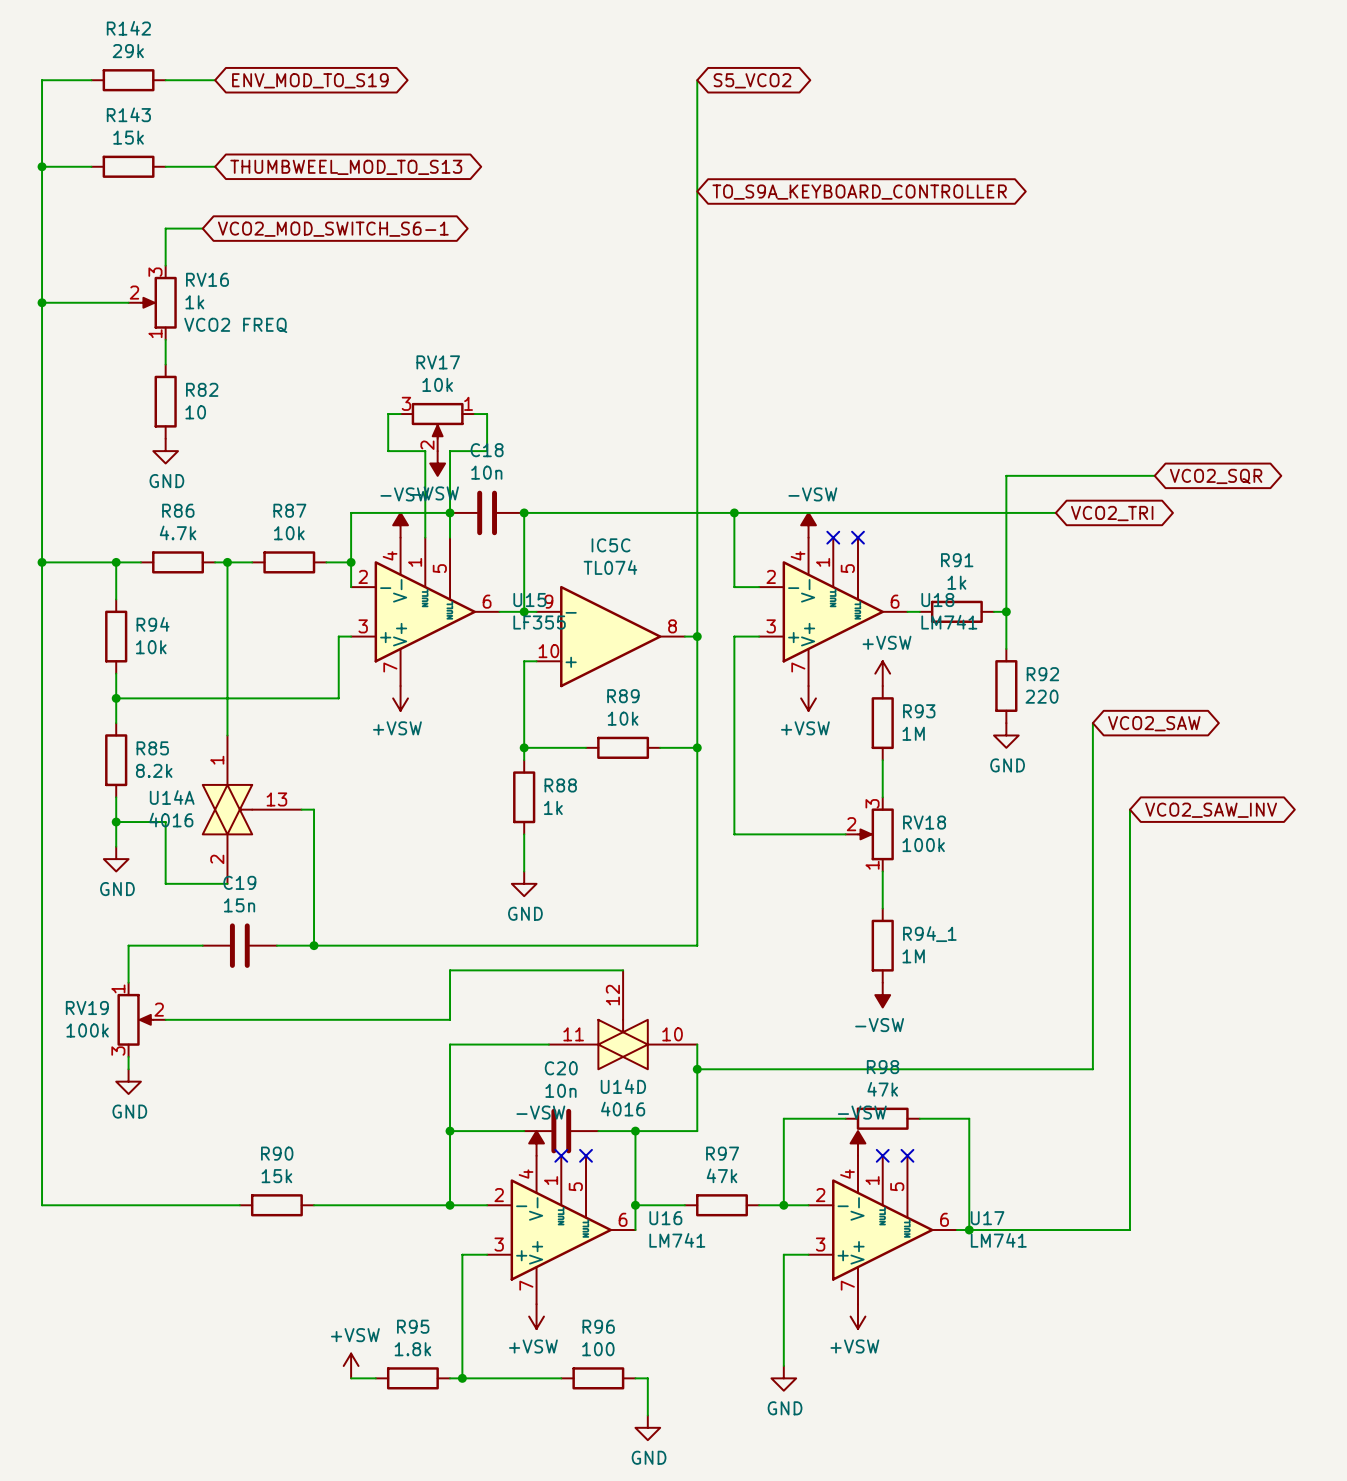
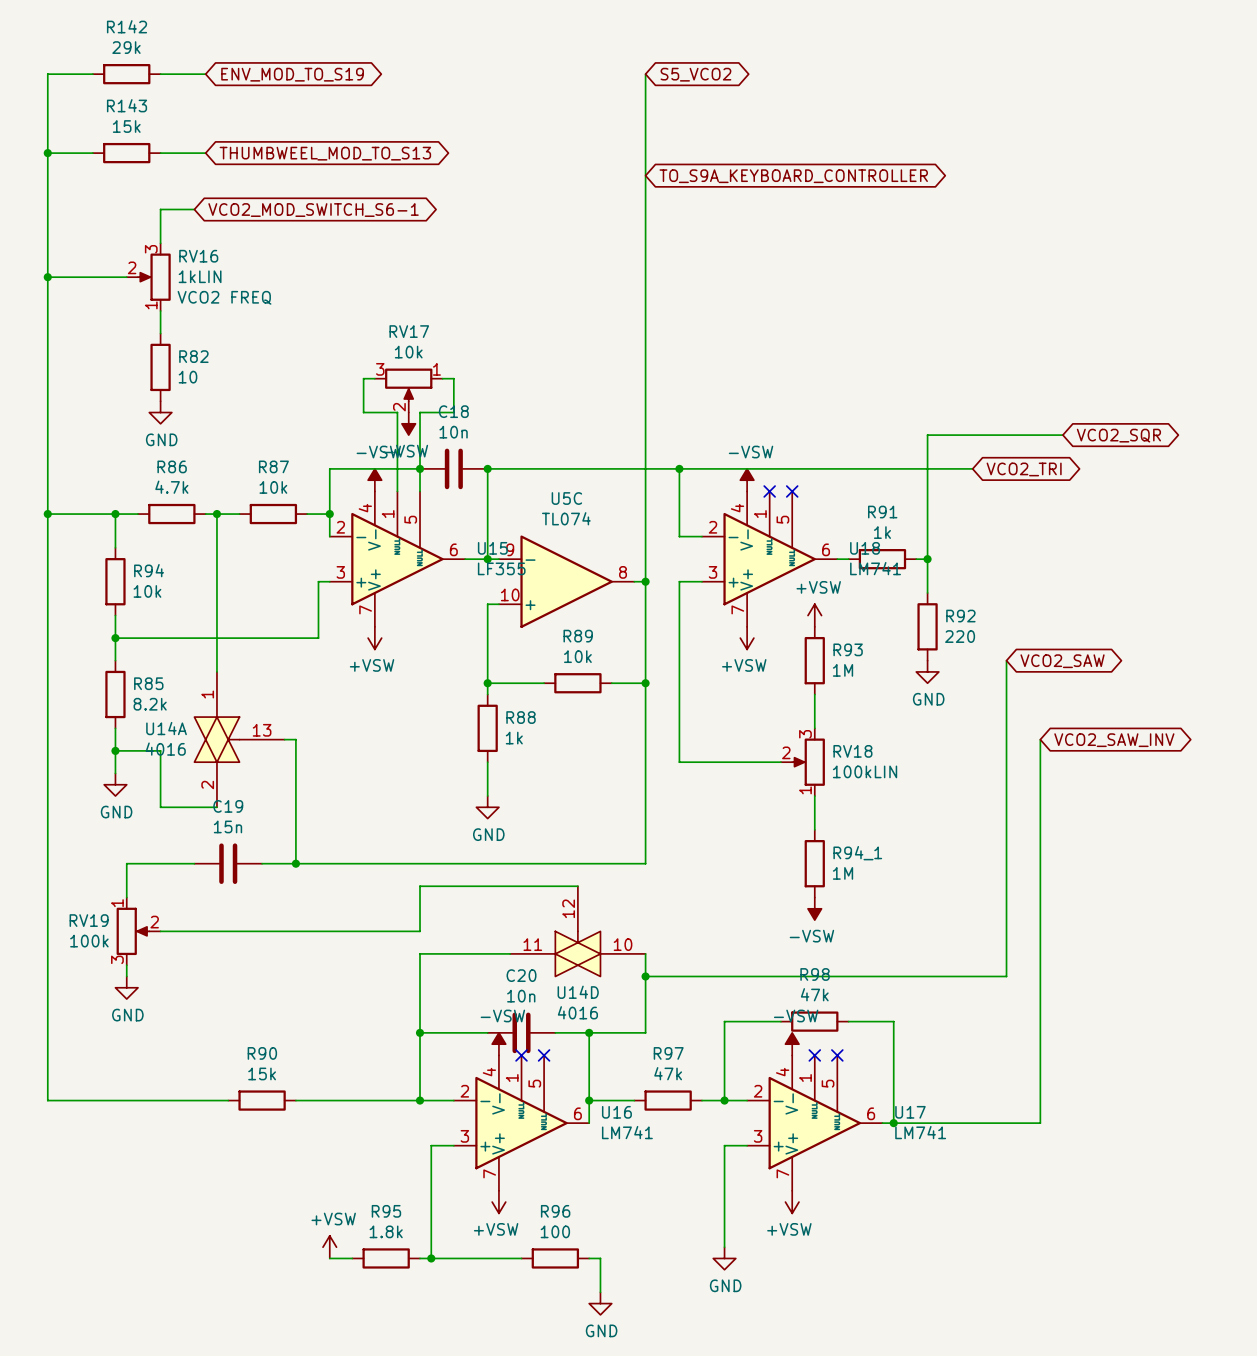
RV16 value: 1k (194, 302) -> 1kLIN (200, 276)
IC5C name: IC5C (611, 545) -> U5C (566, 498)
RV18 value: 100k (923, 845) -> 100kLIN (865, 771)

